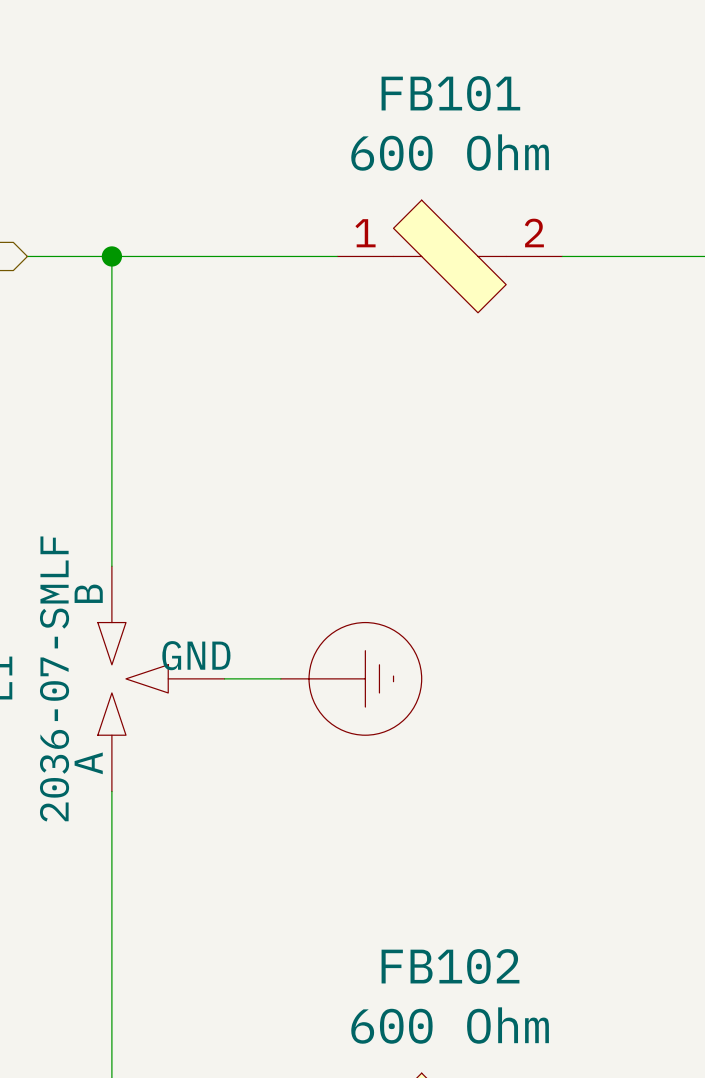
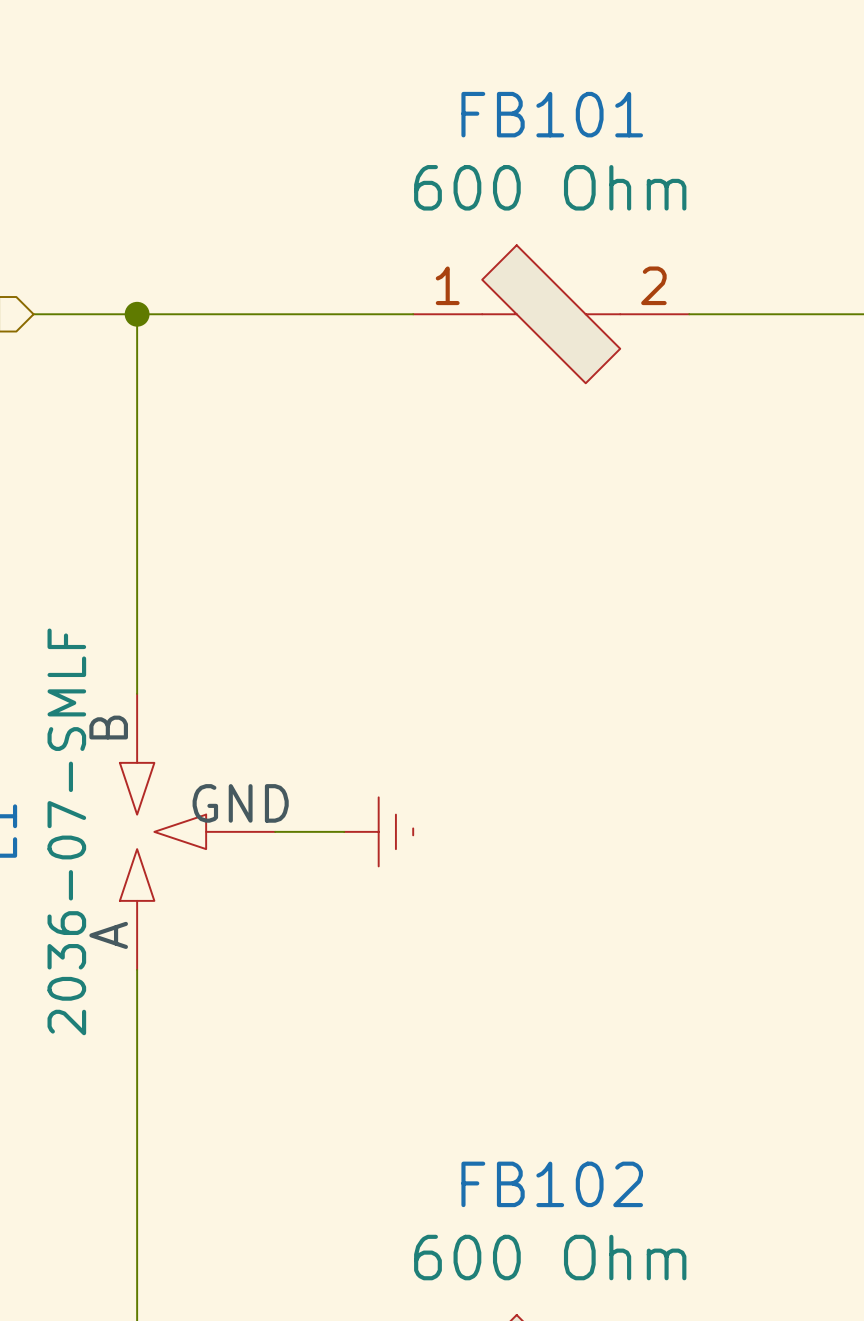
power symbol: none -> (378, 831)
power symbol: (351, 678) -> none

